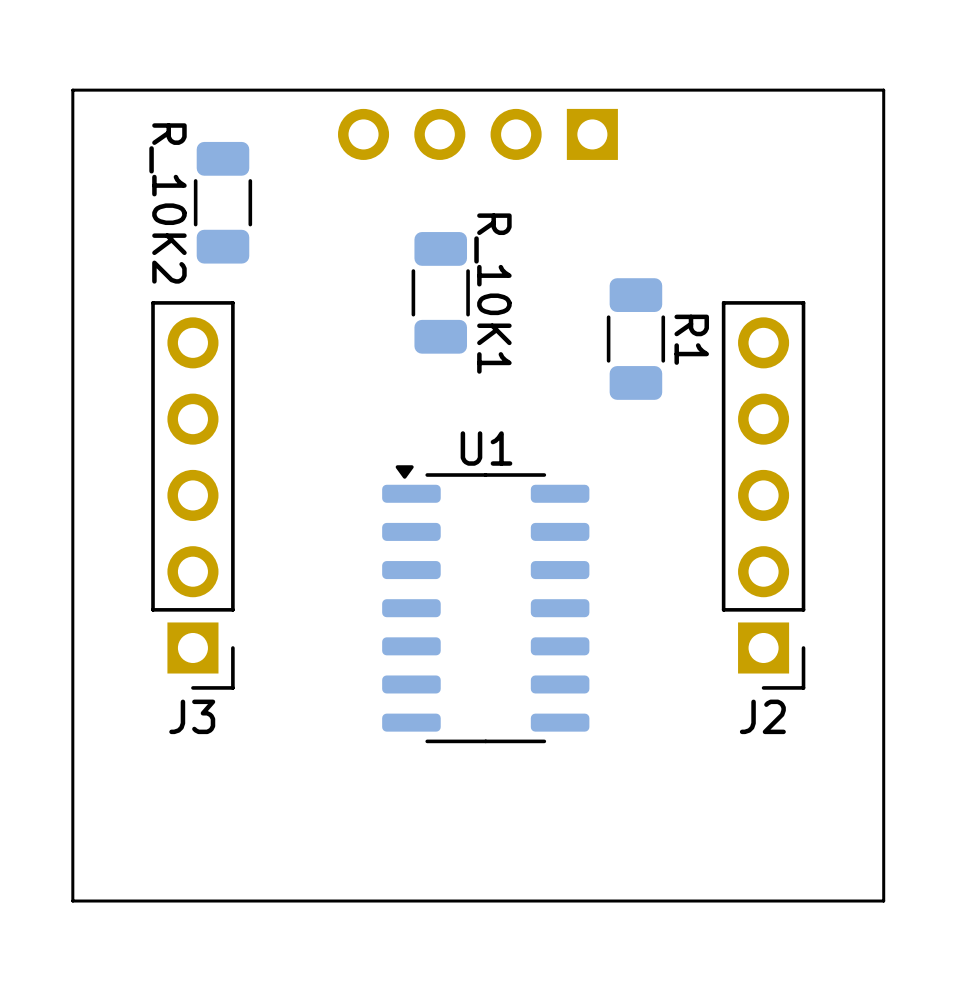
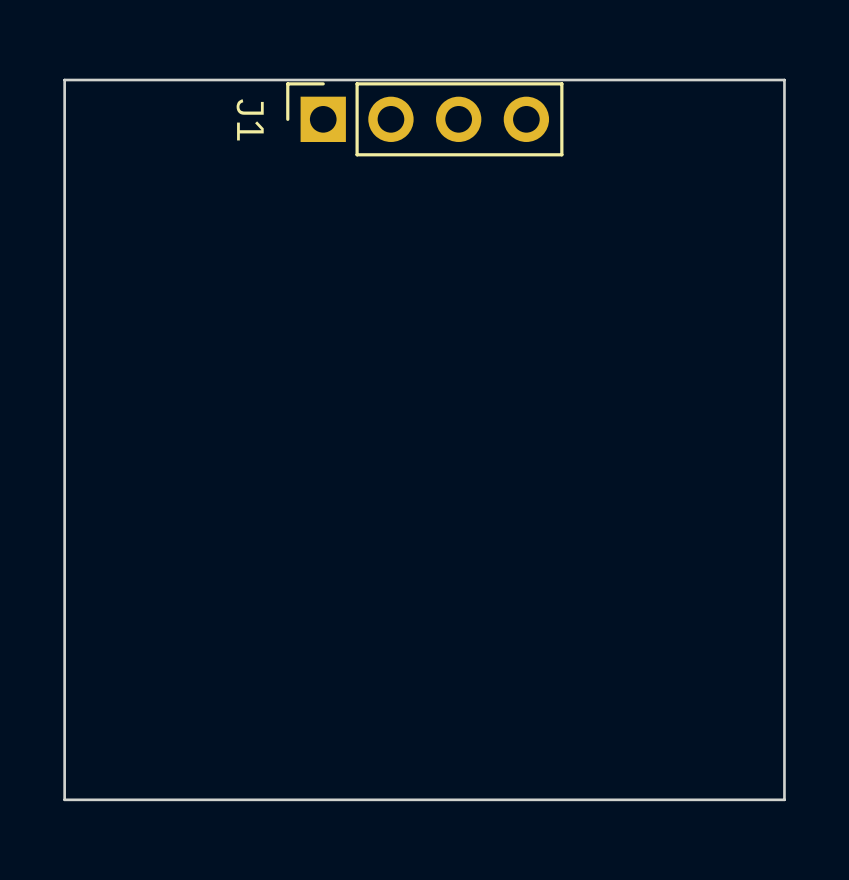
J1 side: top (477, 134) -> bottom (424, 119)
R_10K2: (222, 202) -> none
R_10K1: (440, 292) -> none
R1: (635, 339) -> none
J3: (192, 495) -> none
J2: (763, 495) -> none
U1: (485, 604) -> none

